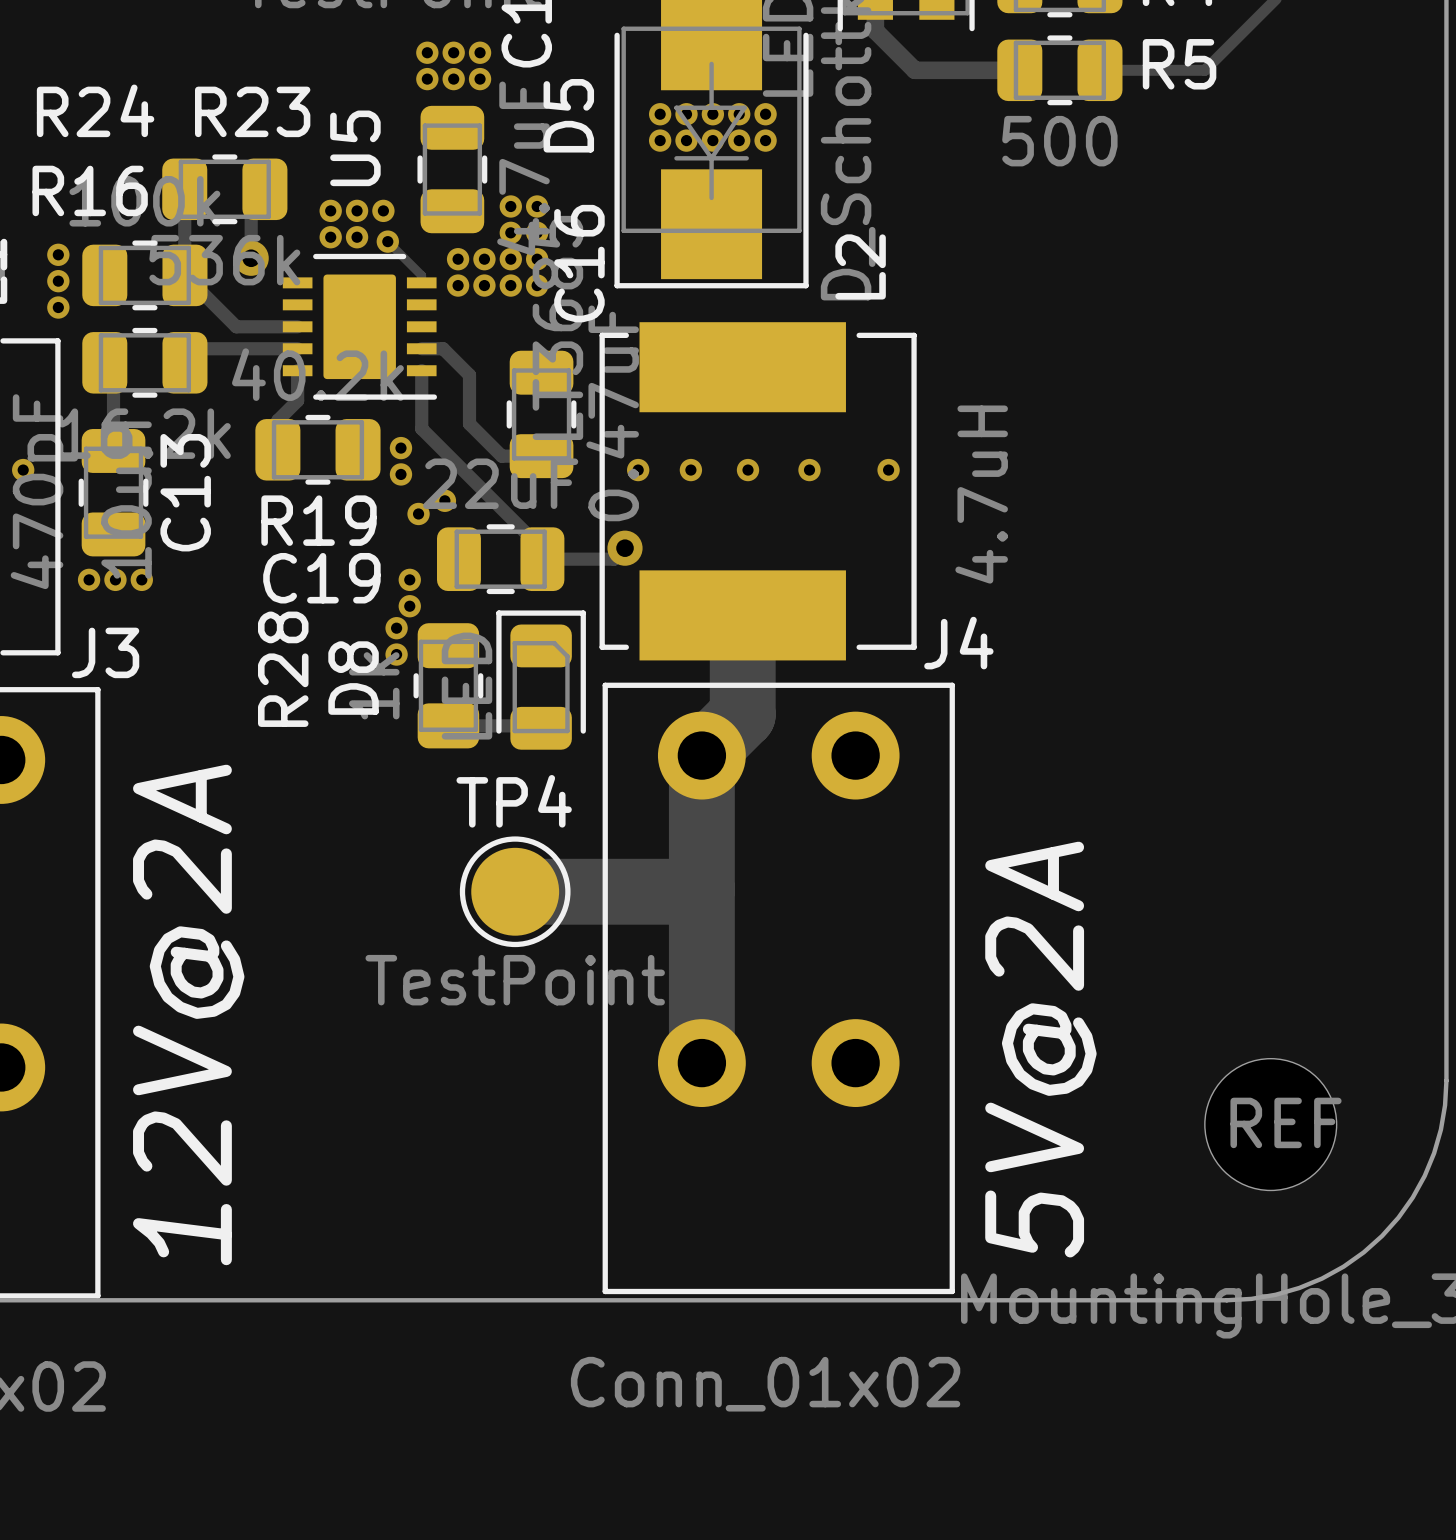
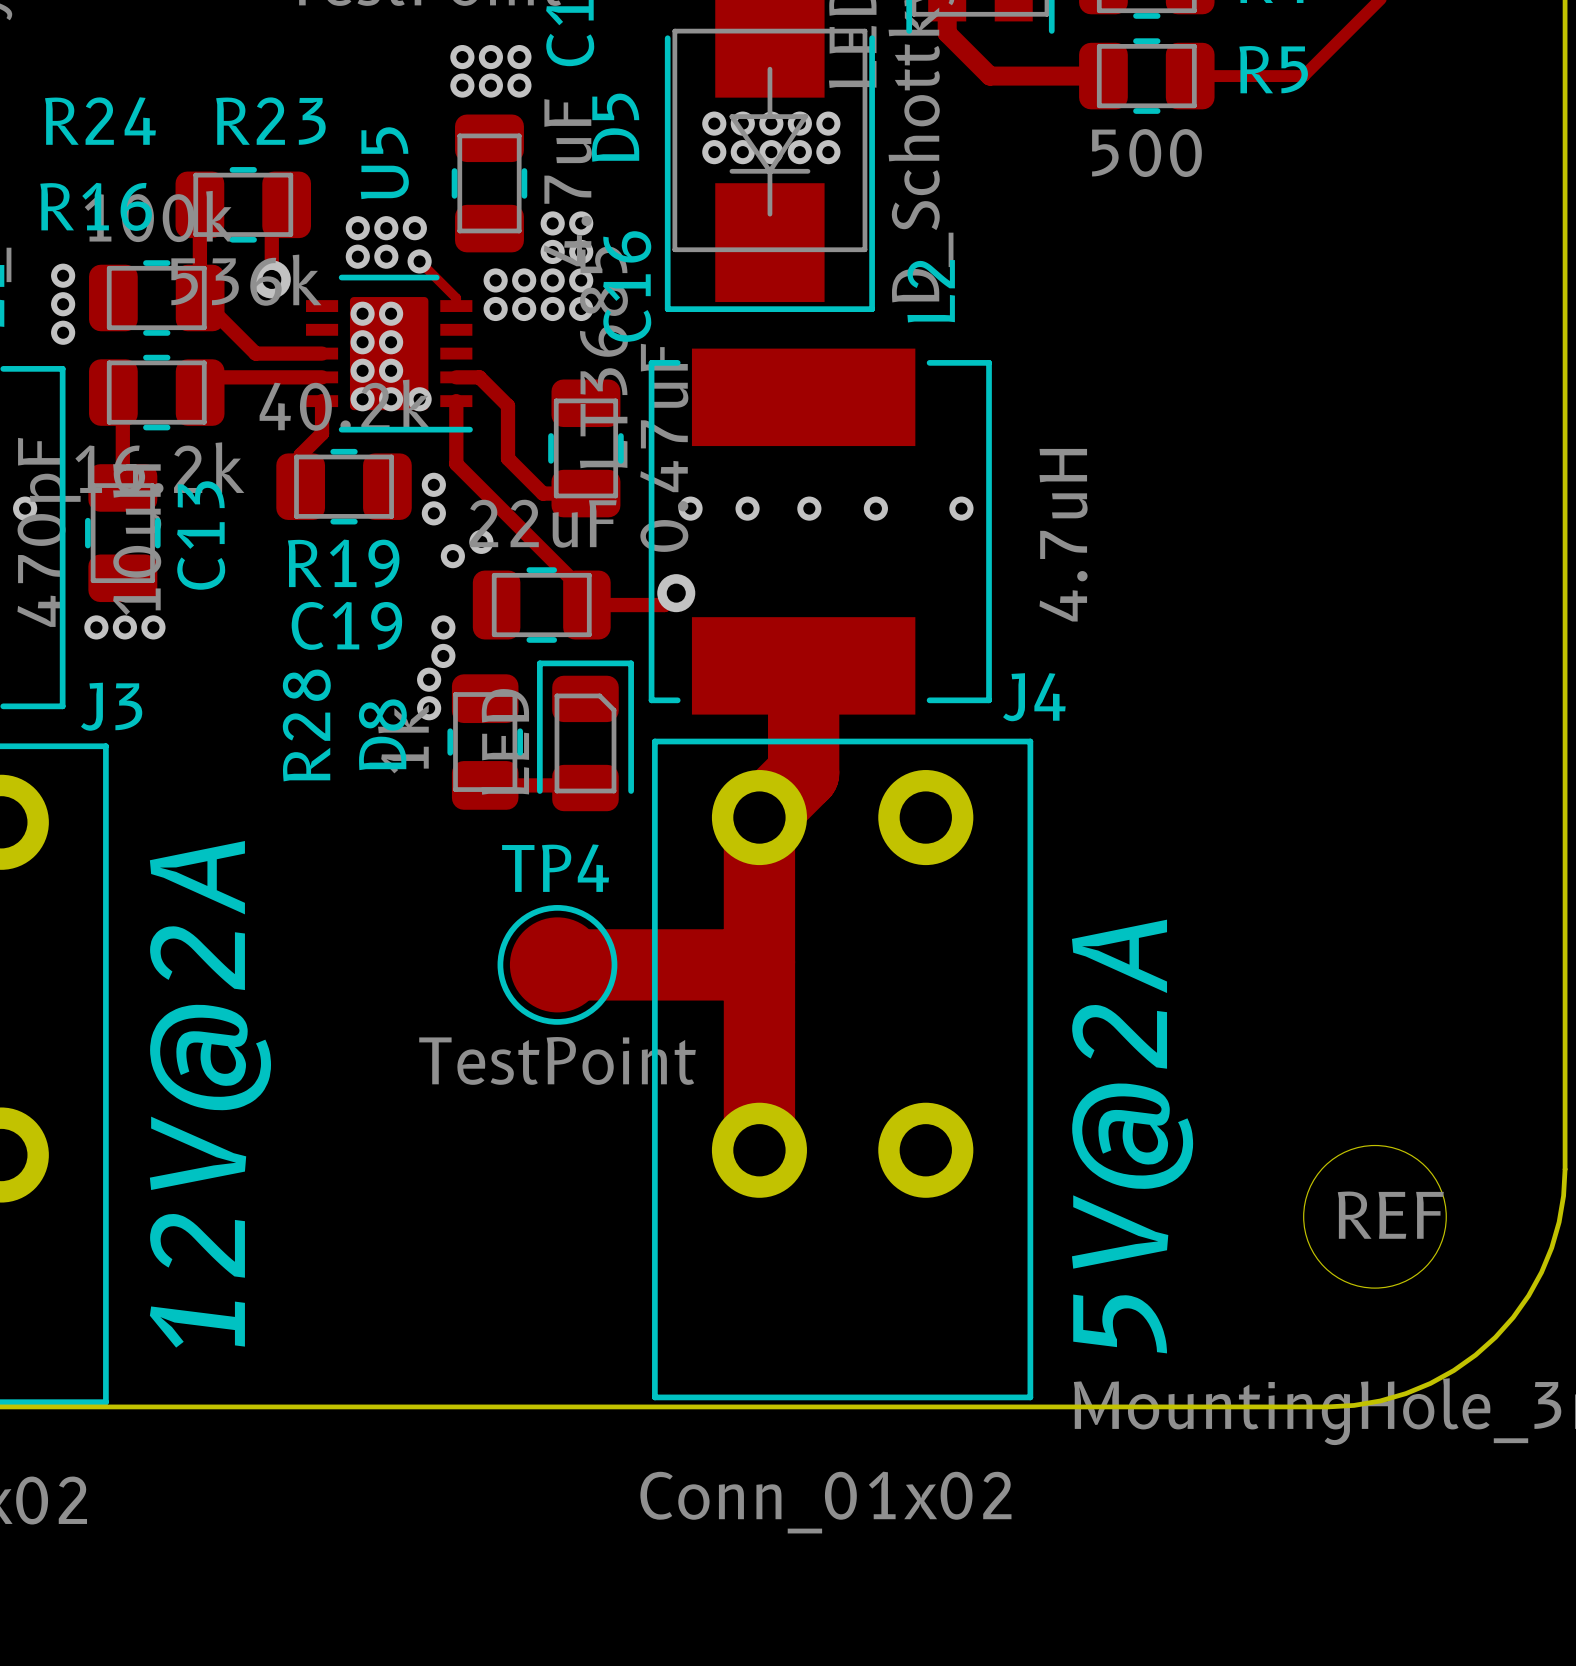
via: none -> (362, 313)
via: none -> (391, 313)
via: none -> (362, 342)
via: none -> (391, 342)
via: none -> (362, 370)
via: none -> (391, 370)
via: none -> (362, 399)
via: none -> (391, 399)
via: none -> (419, 399)

